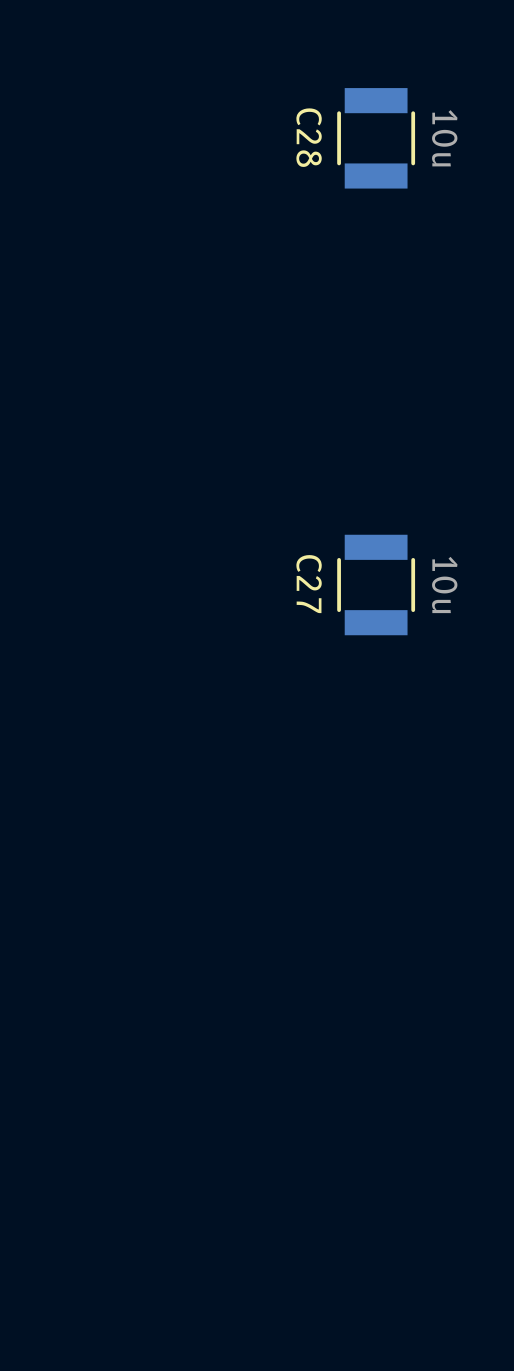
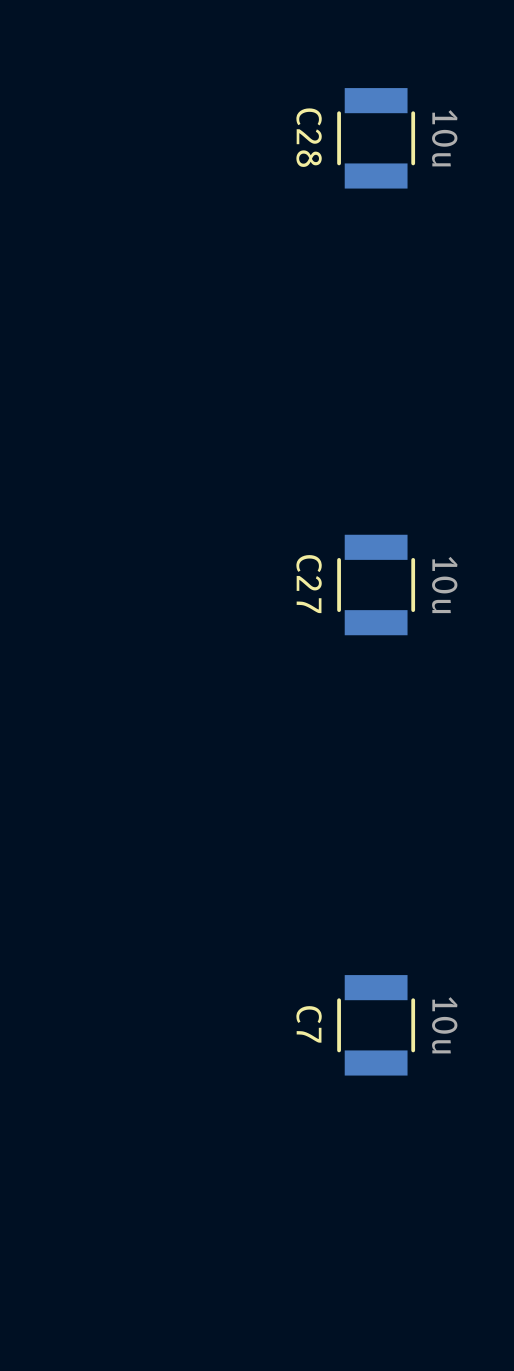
C7: none -> 10u (376, 1025)

